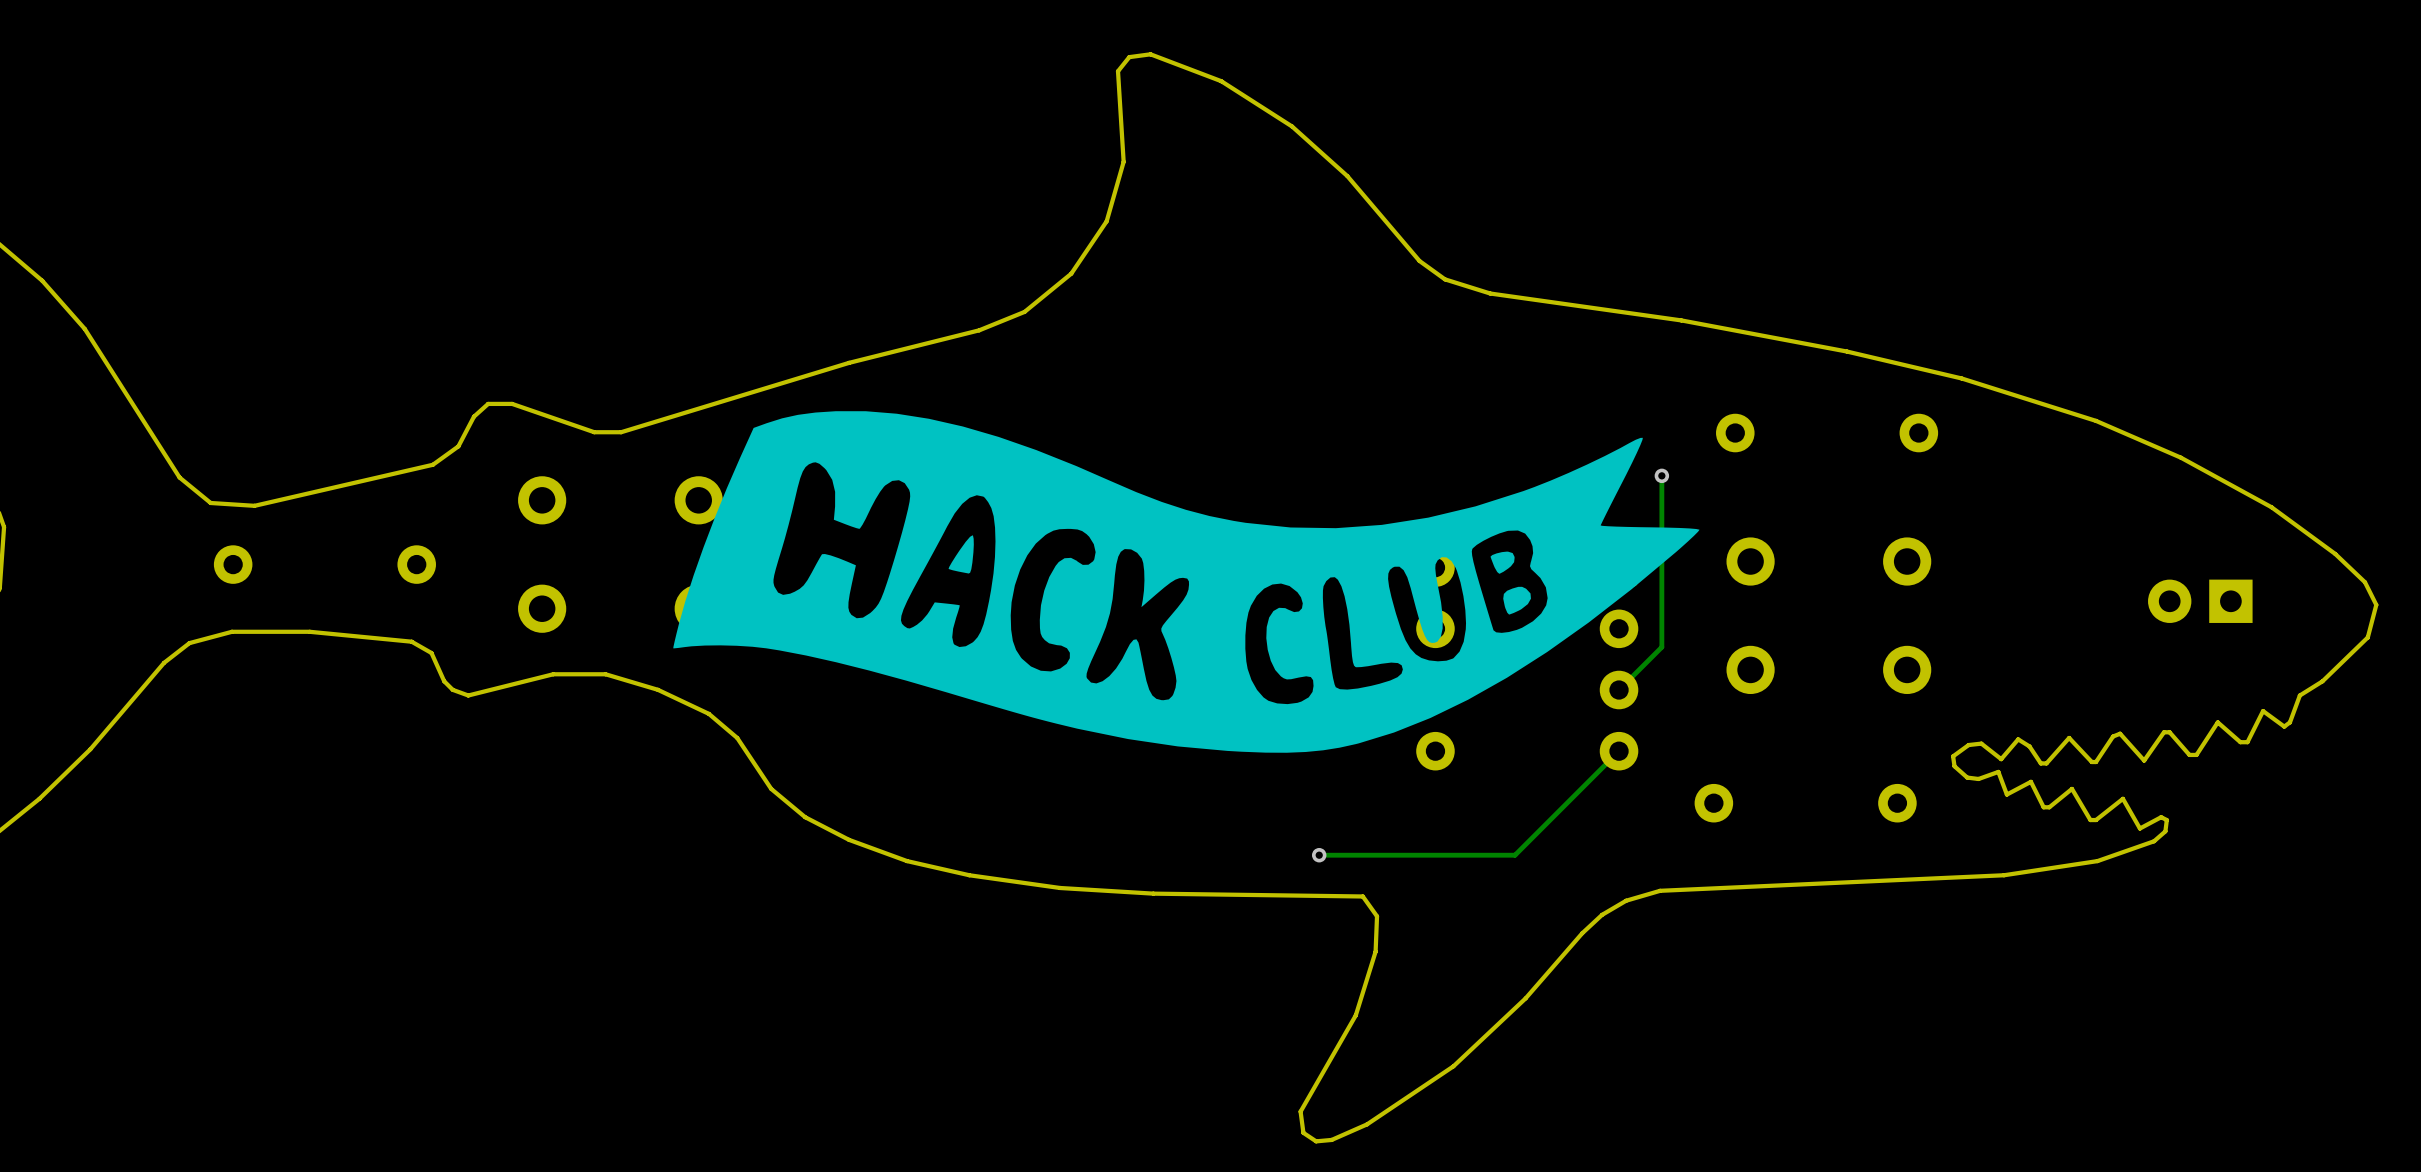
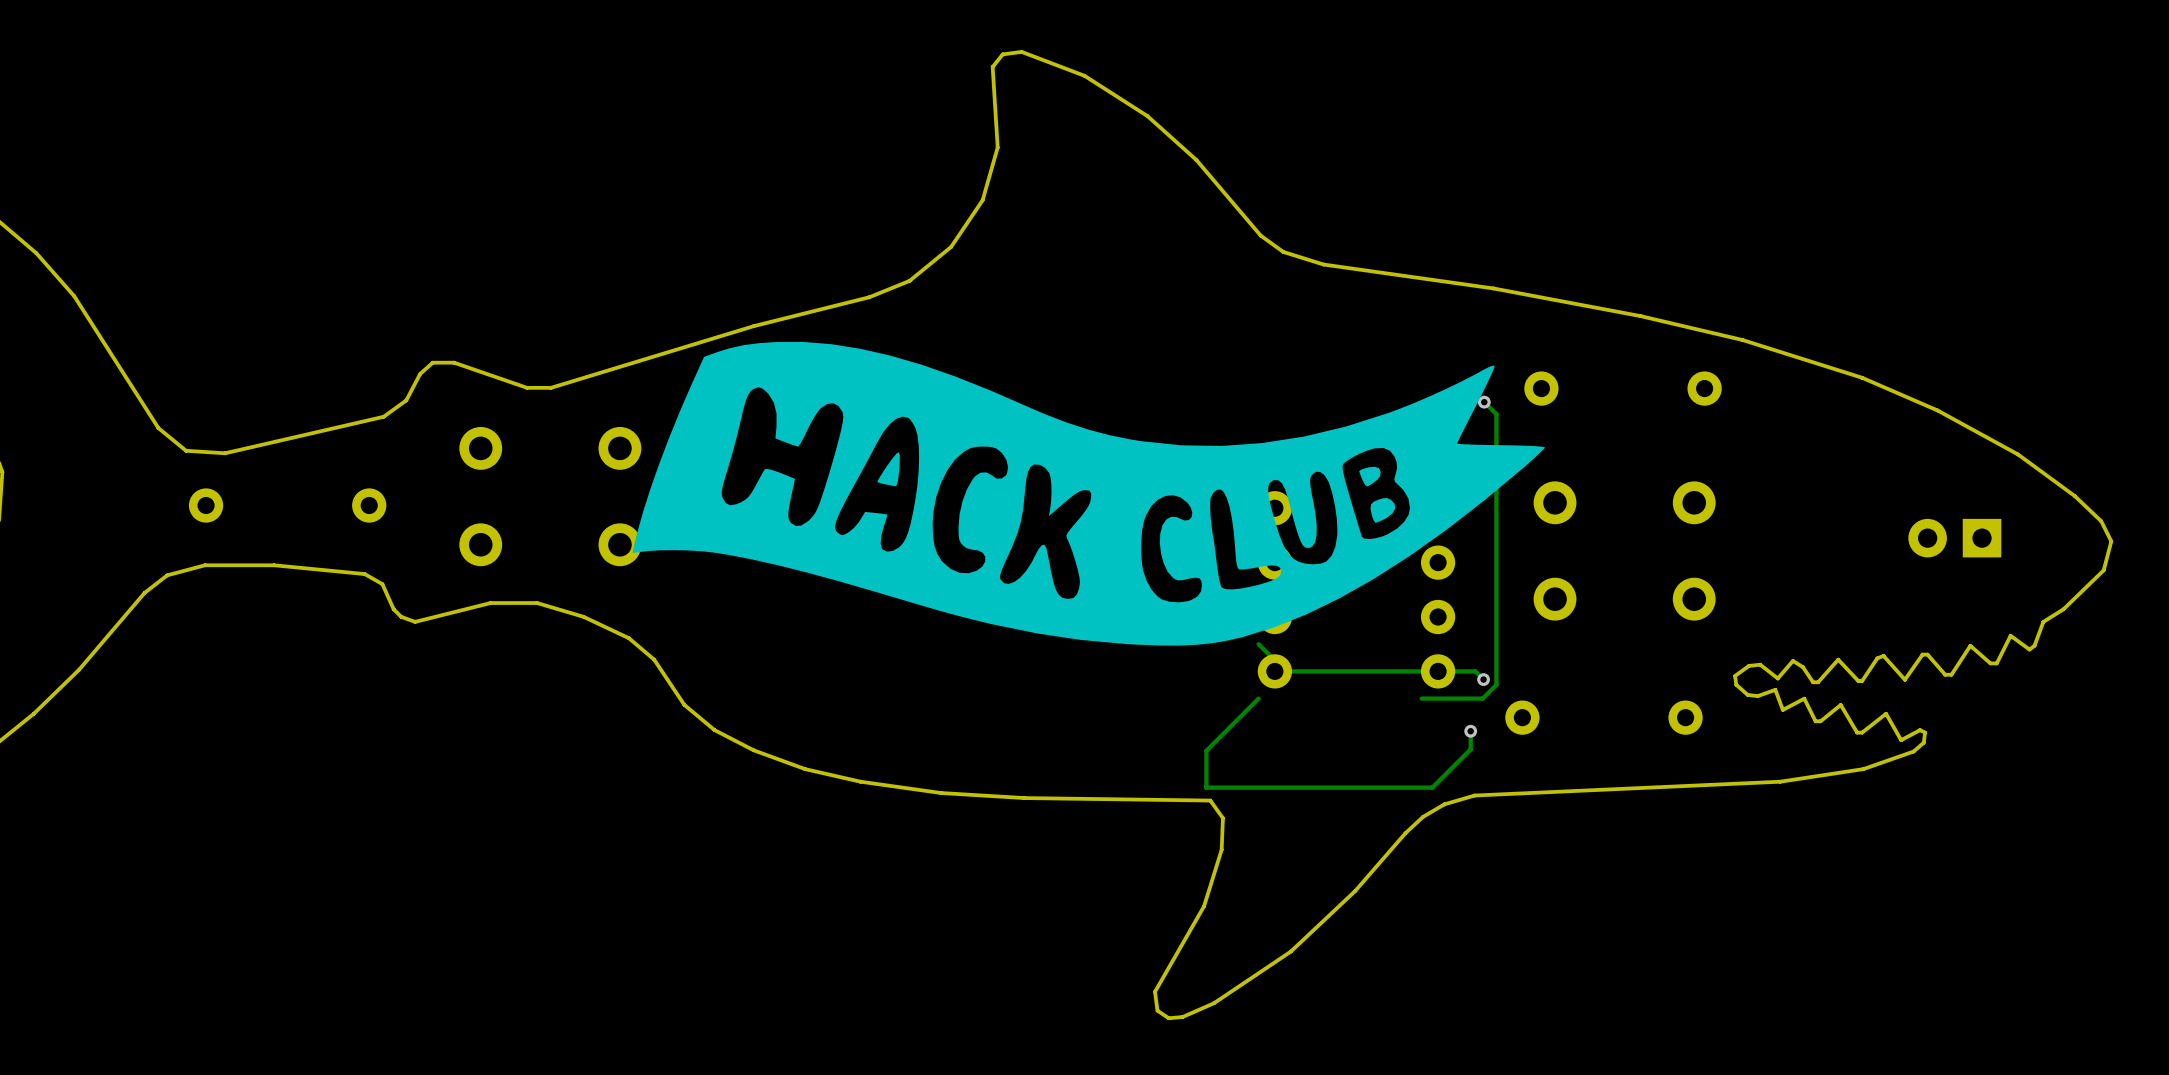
track: none -> (1484, 402) (1496, 414) (1496, 684) (1482, 698) (1421, 698)
track: (1661, 475) (1661, 647) (1619, 690) -> none
via position: (1661, 475) -> (1484, 402)
drawing position: (1186, 581) -> (1088, 493)
track: none -> (1258, 644) (1285, 671) (1475, 671) (1483, 679)
track: (1619, 751) (1515, 855) (1319, 855) -> none
via: none -> (1483, 679)
track: none -> (1258, 698) (1206, 750) (1206, 787) (1432, 787) (1470, 749) (1470, 731)
via: none -> (1470, 731)
via: (1319, 855) -> none

